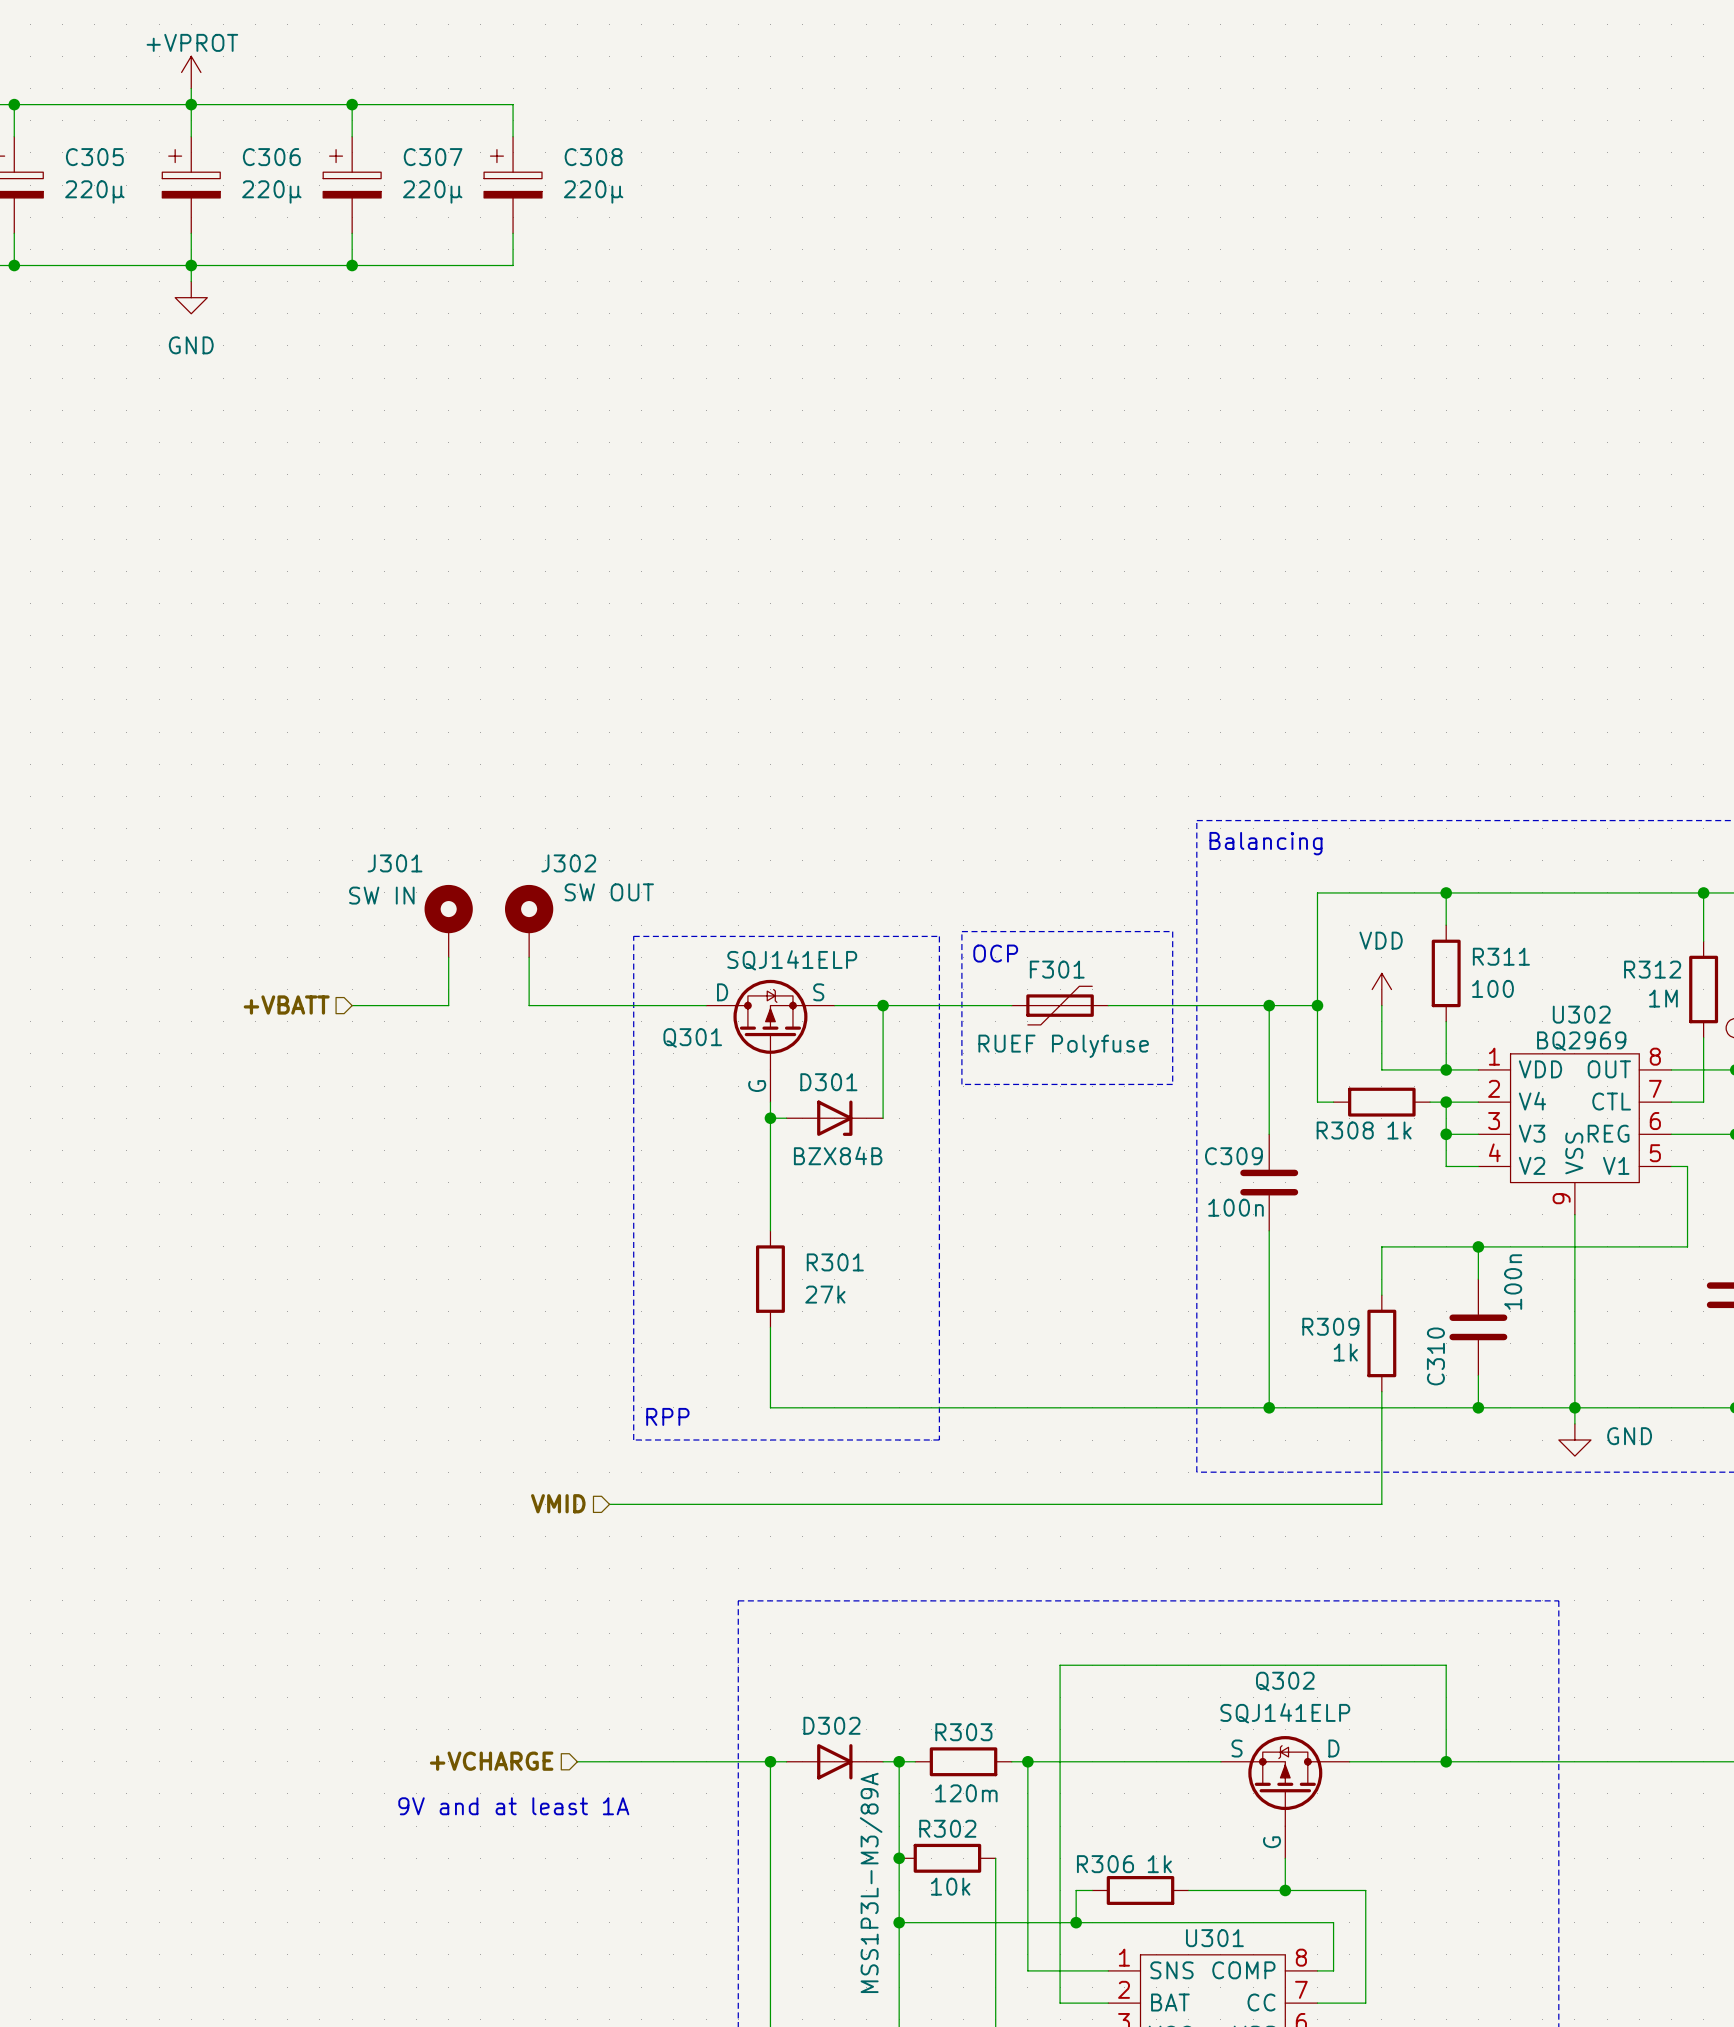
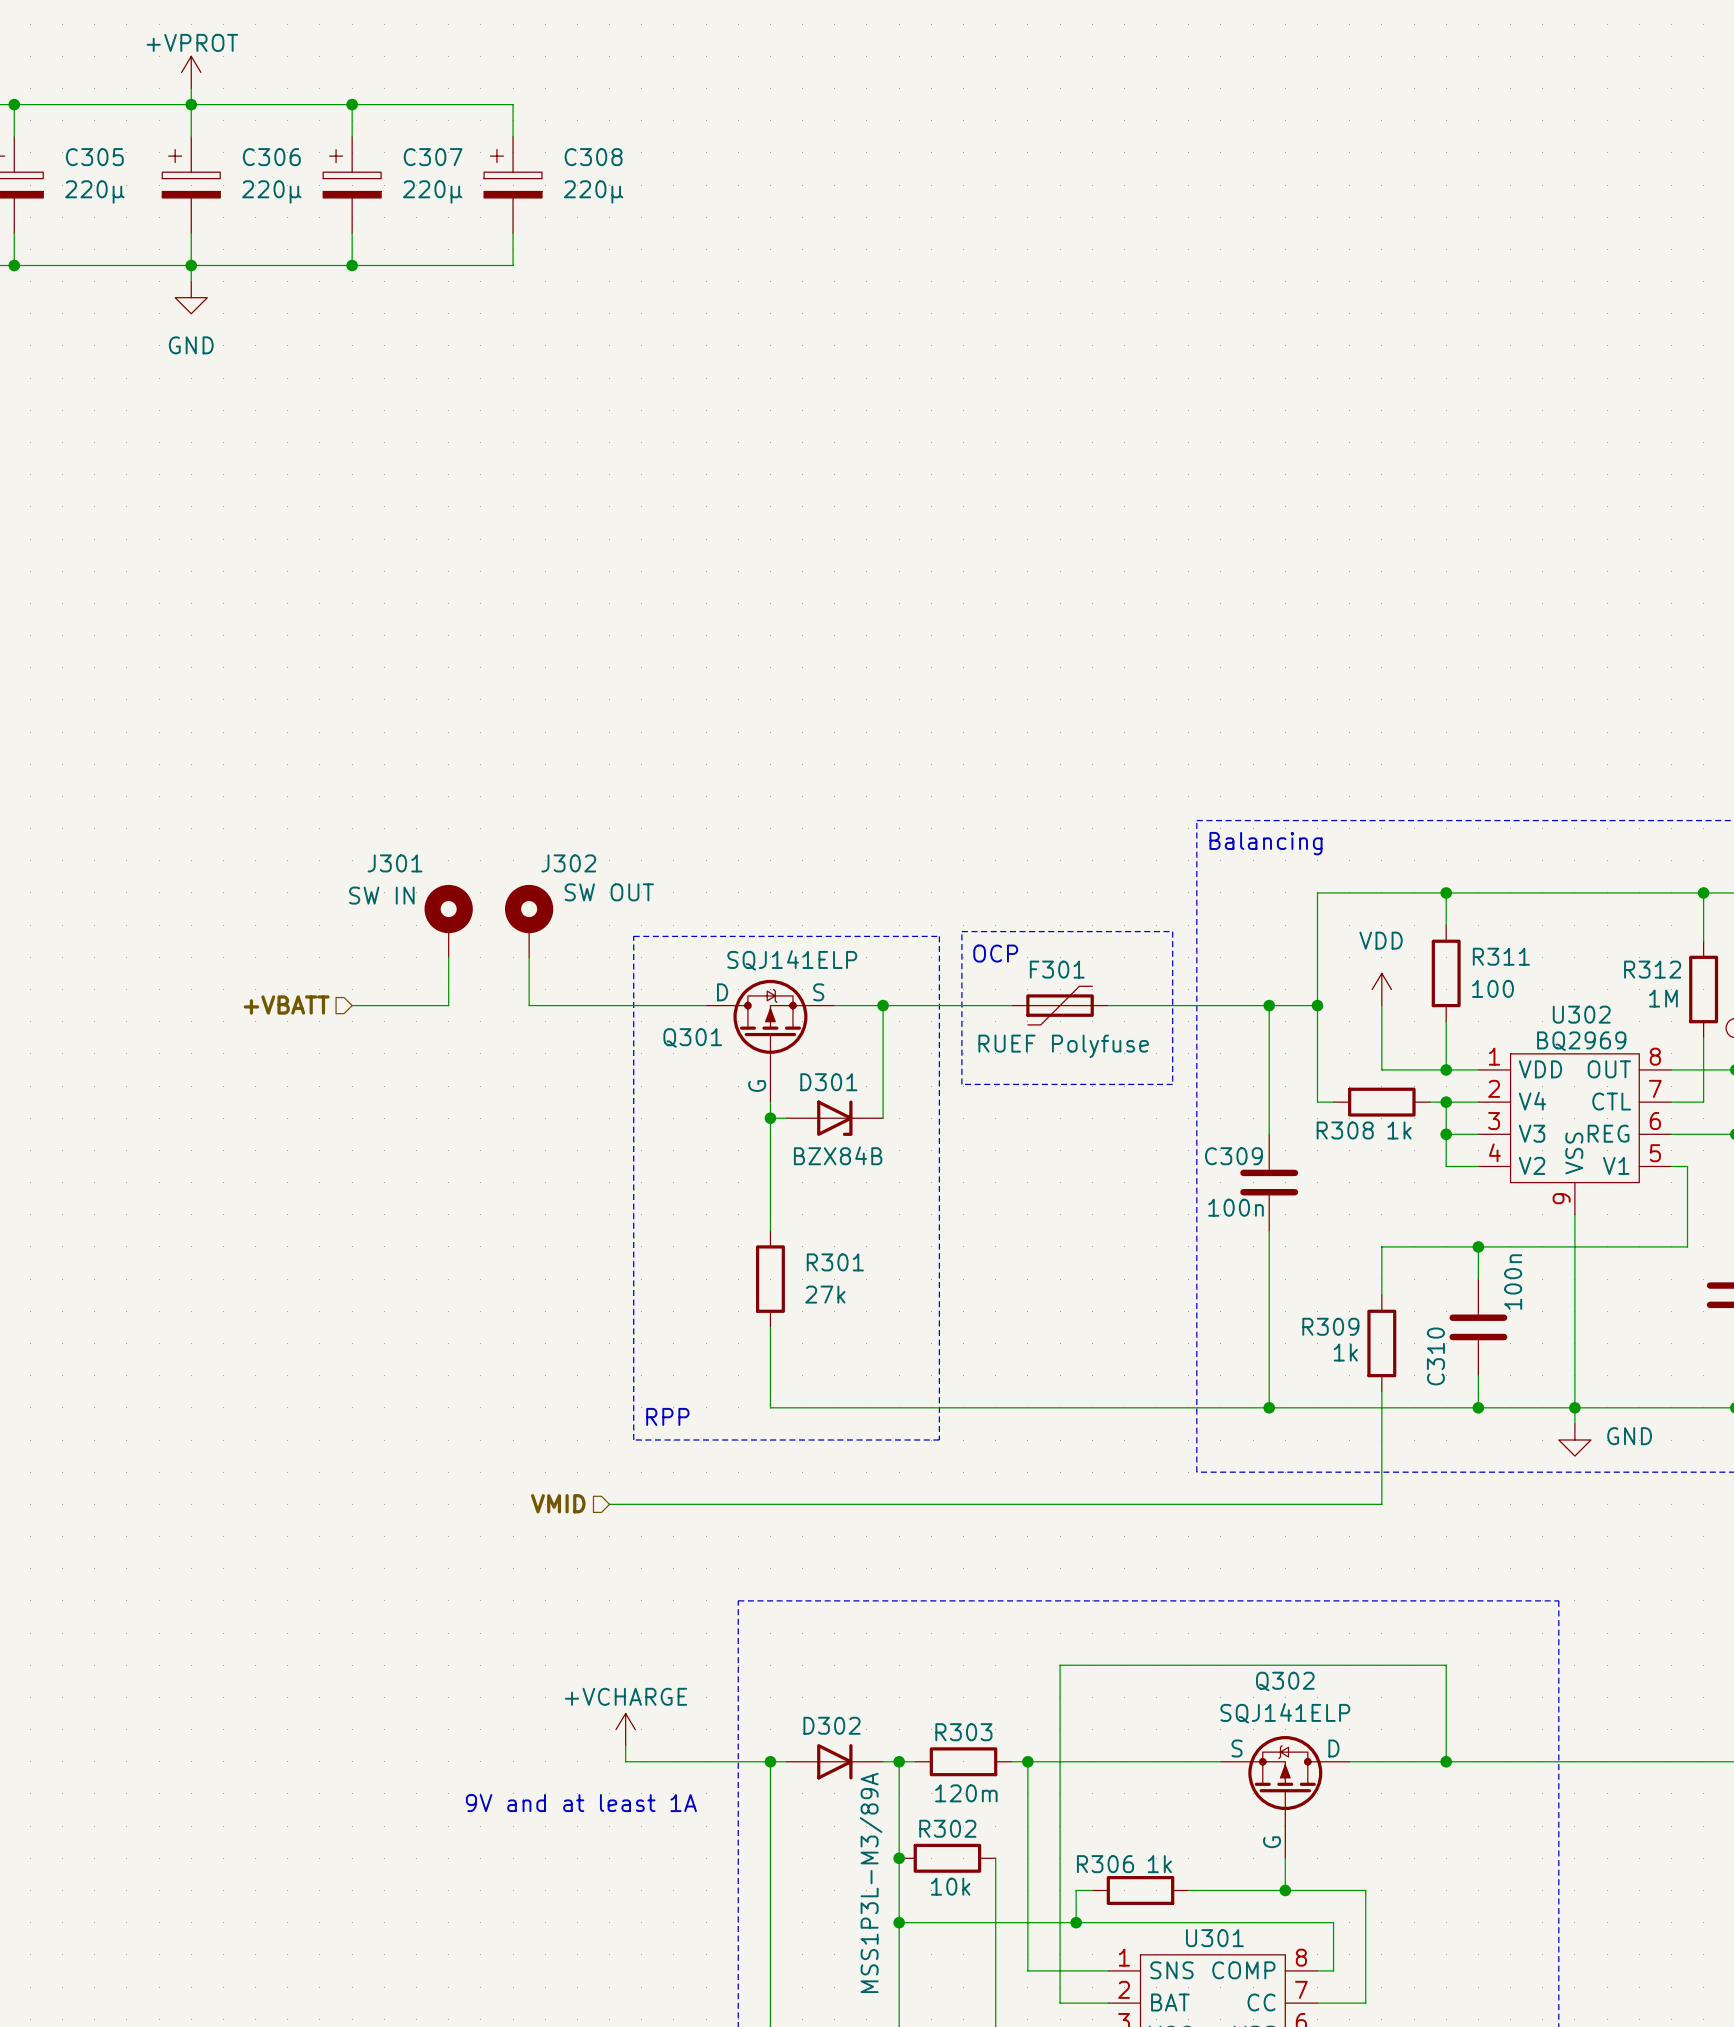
power symbol: none -> +VCHARGE (625, 1729)
hierarchical label: +VCHARGE (491, 1761) -> none
wire: (577, 1761) (625, 1761) -> (625, 1745) (625, 1761)
text position: 9V and at least 1A (513, 1806) -> 9V and at least 1A (581, 1803)

